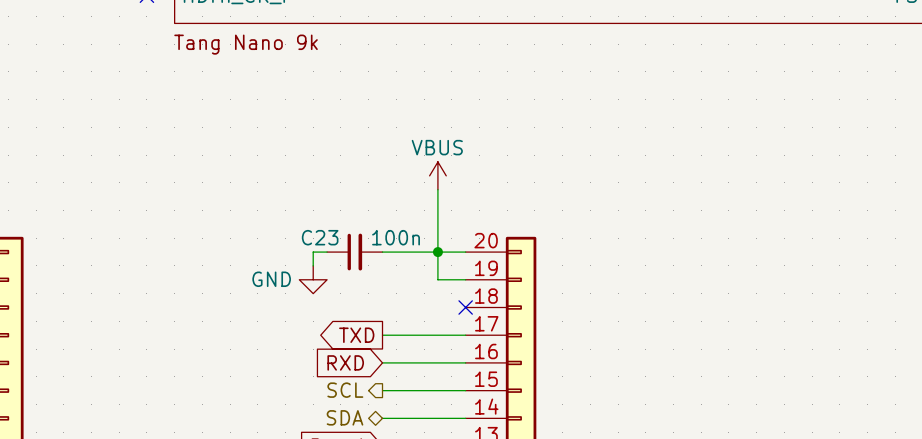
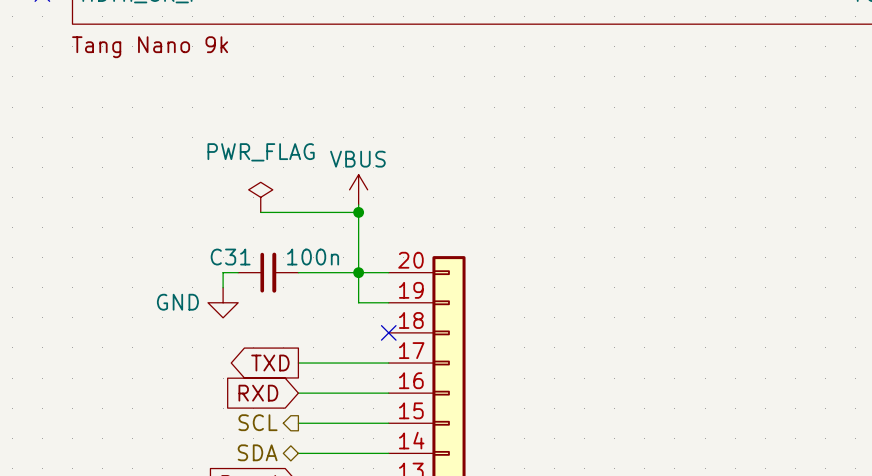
power symbol: none -> PWR_FLAG (260, 197)
wire: none -> (260, 212) (358, 212)
junction: none -> (358, 212)
C23 name: C23 (320, 237) -> C31 (230, 257)

